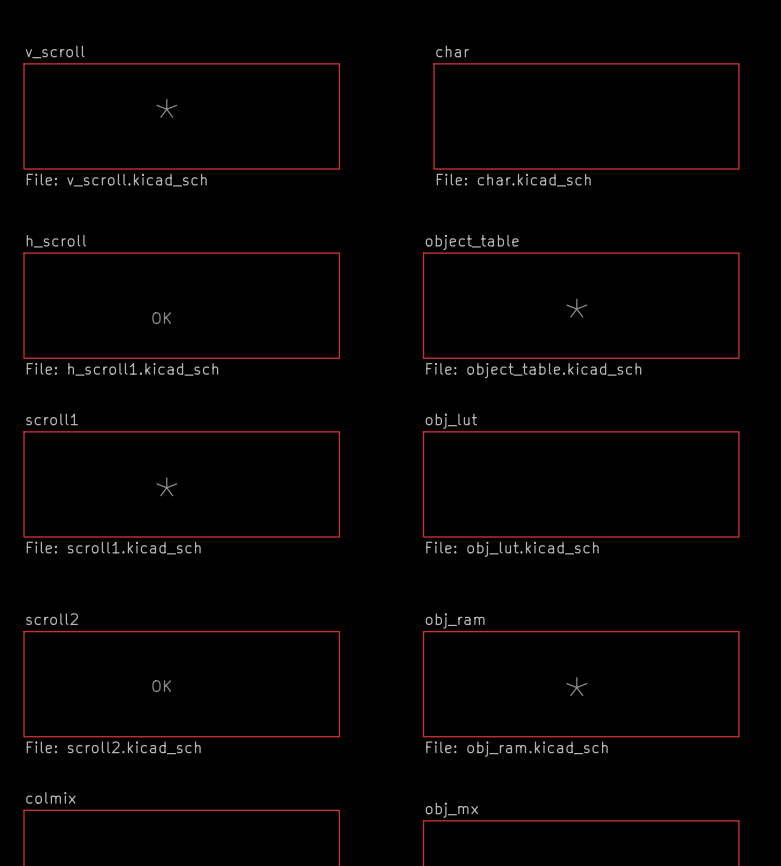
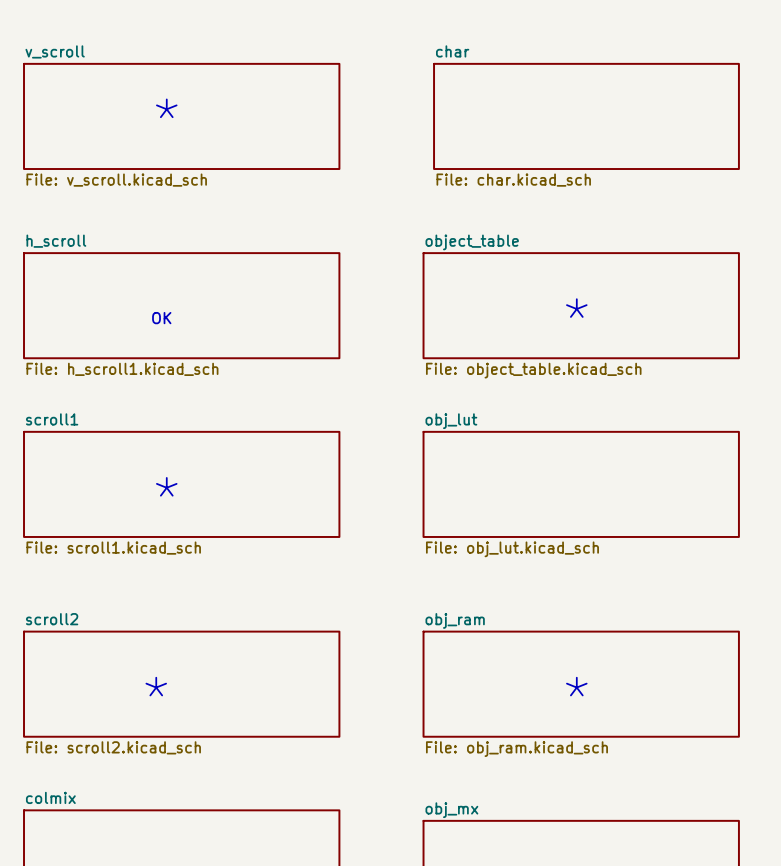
text: none -> * (156, 686)
text: OK (161, 686) -> none

